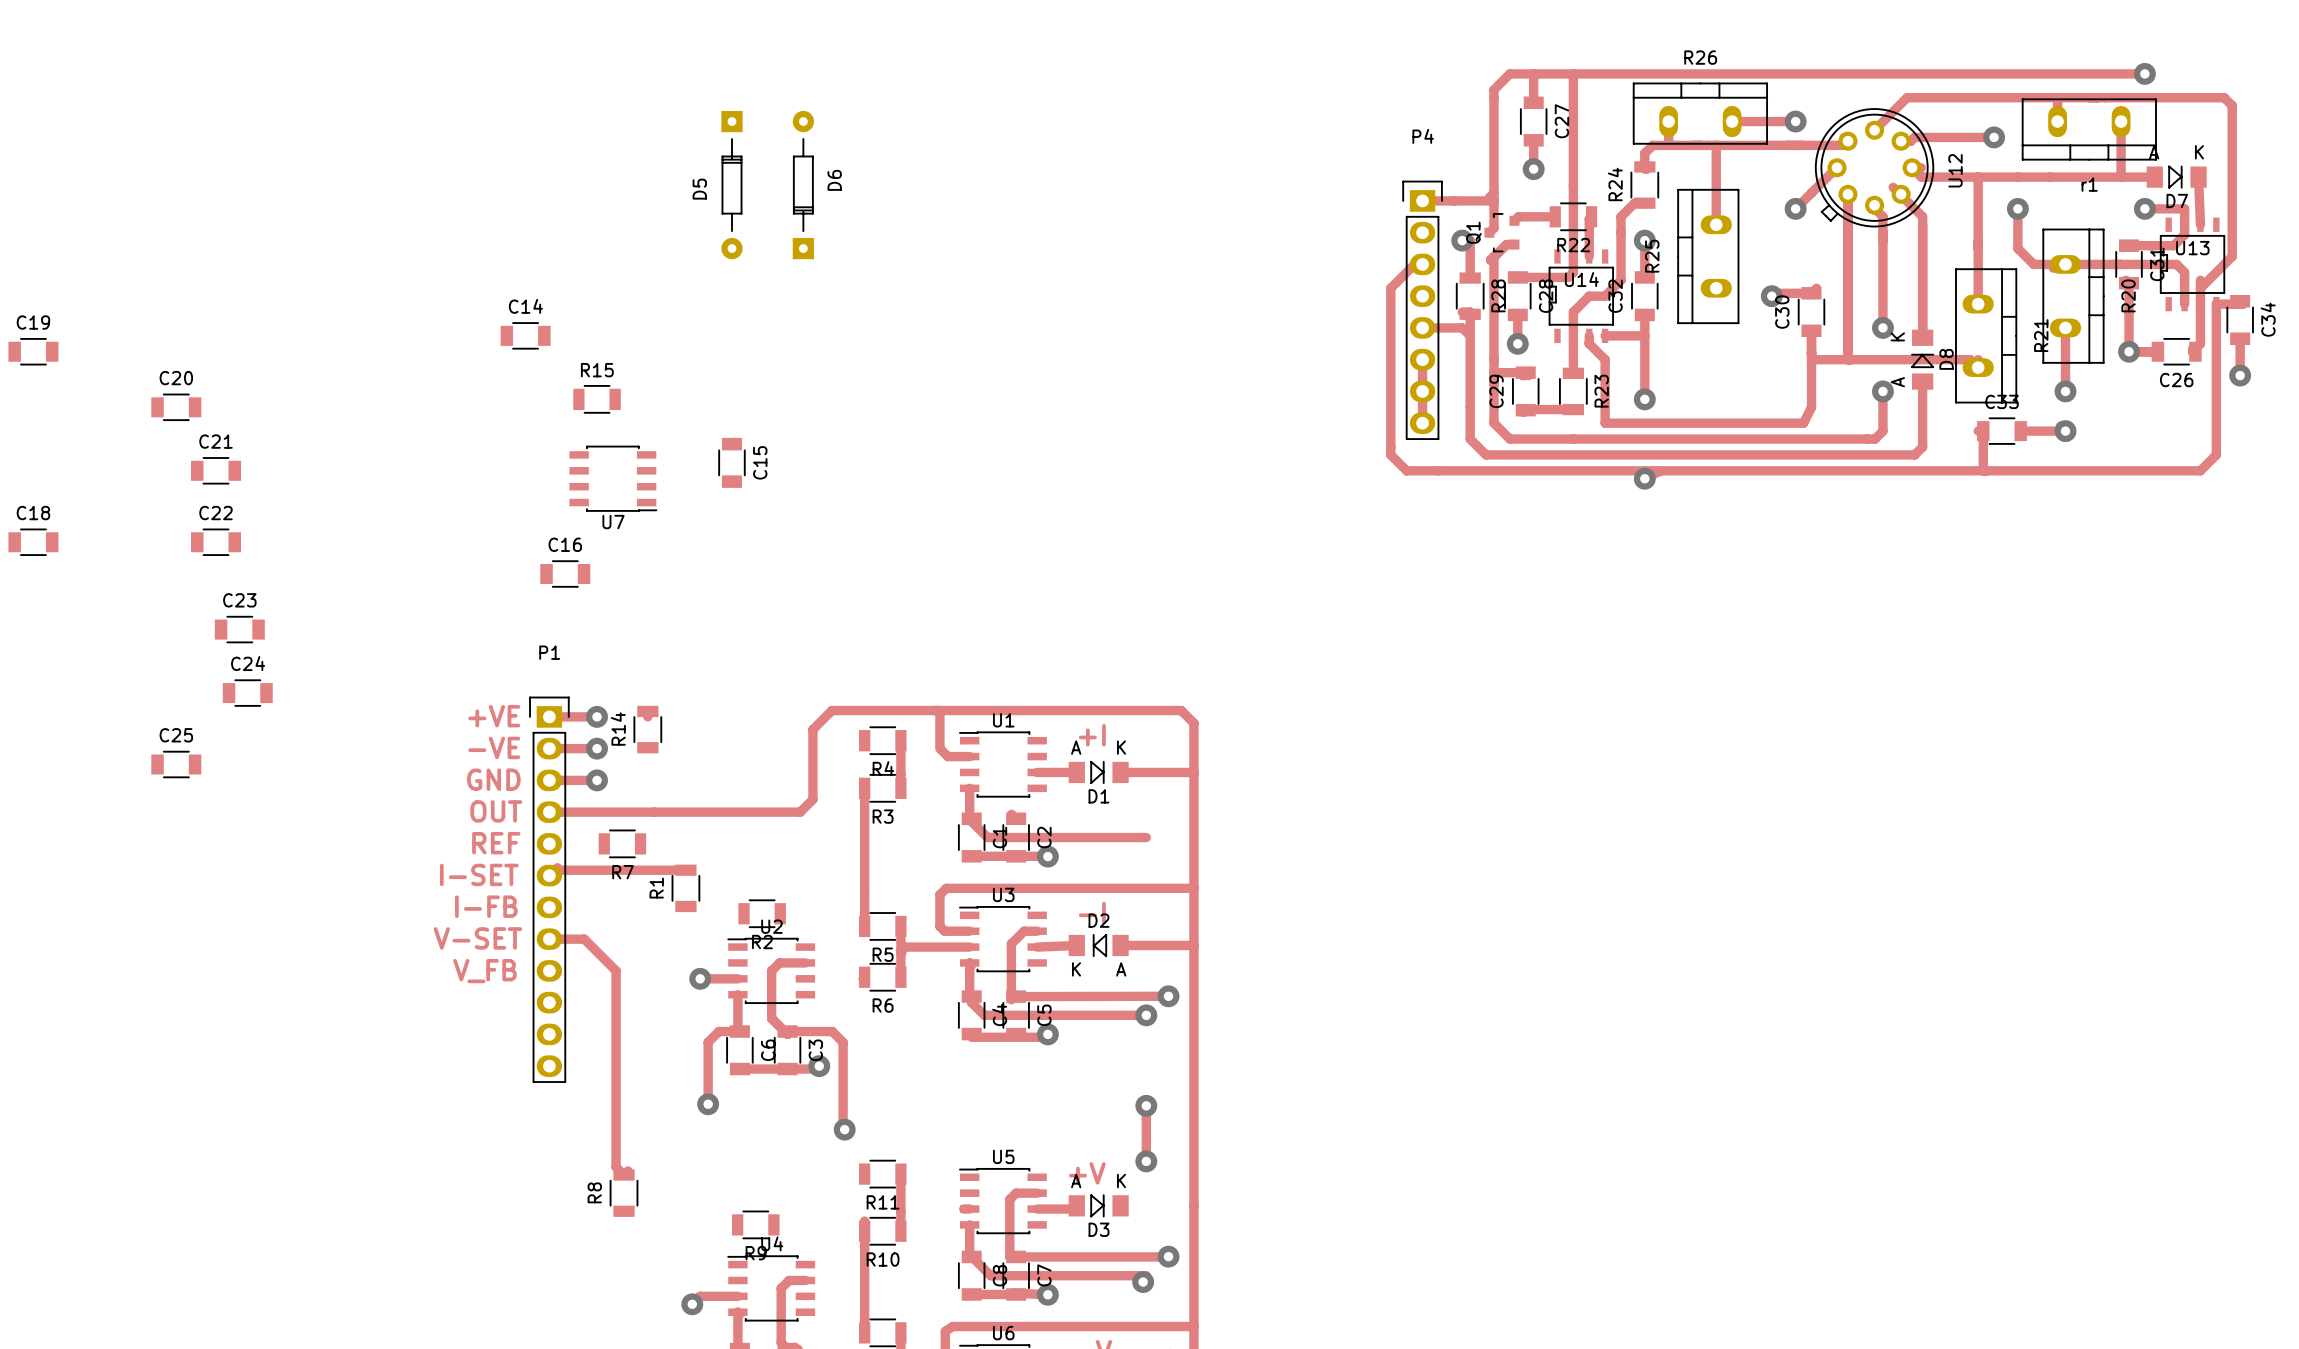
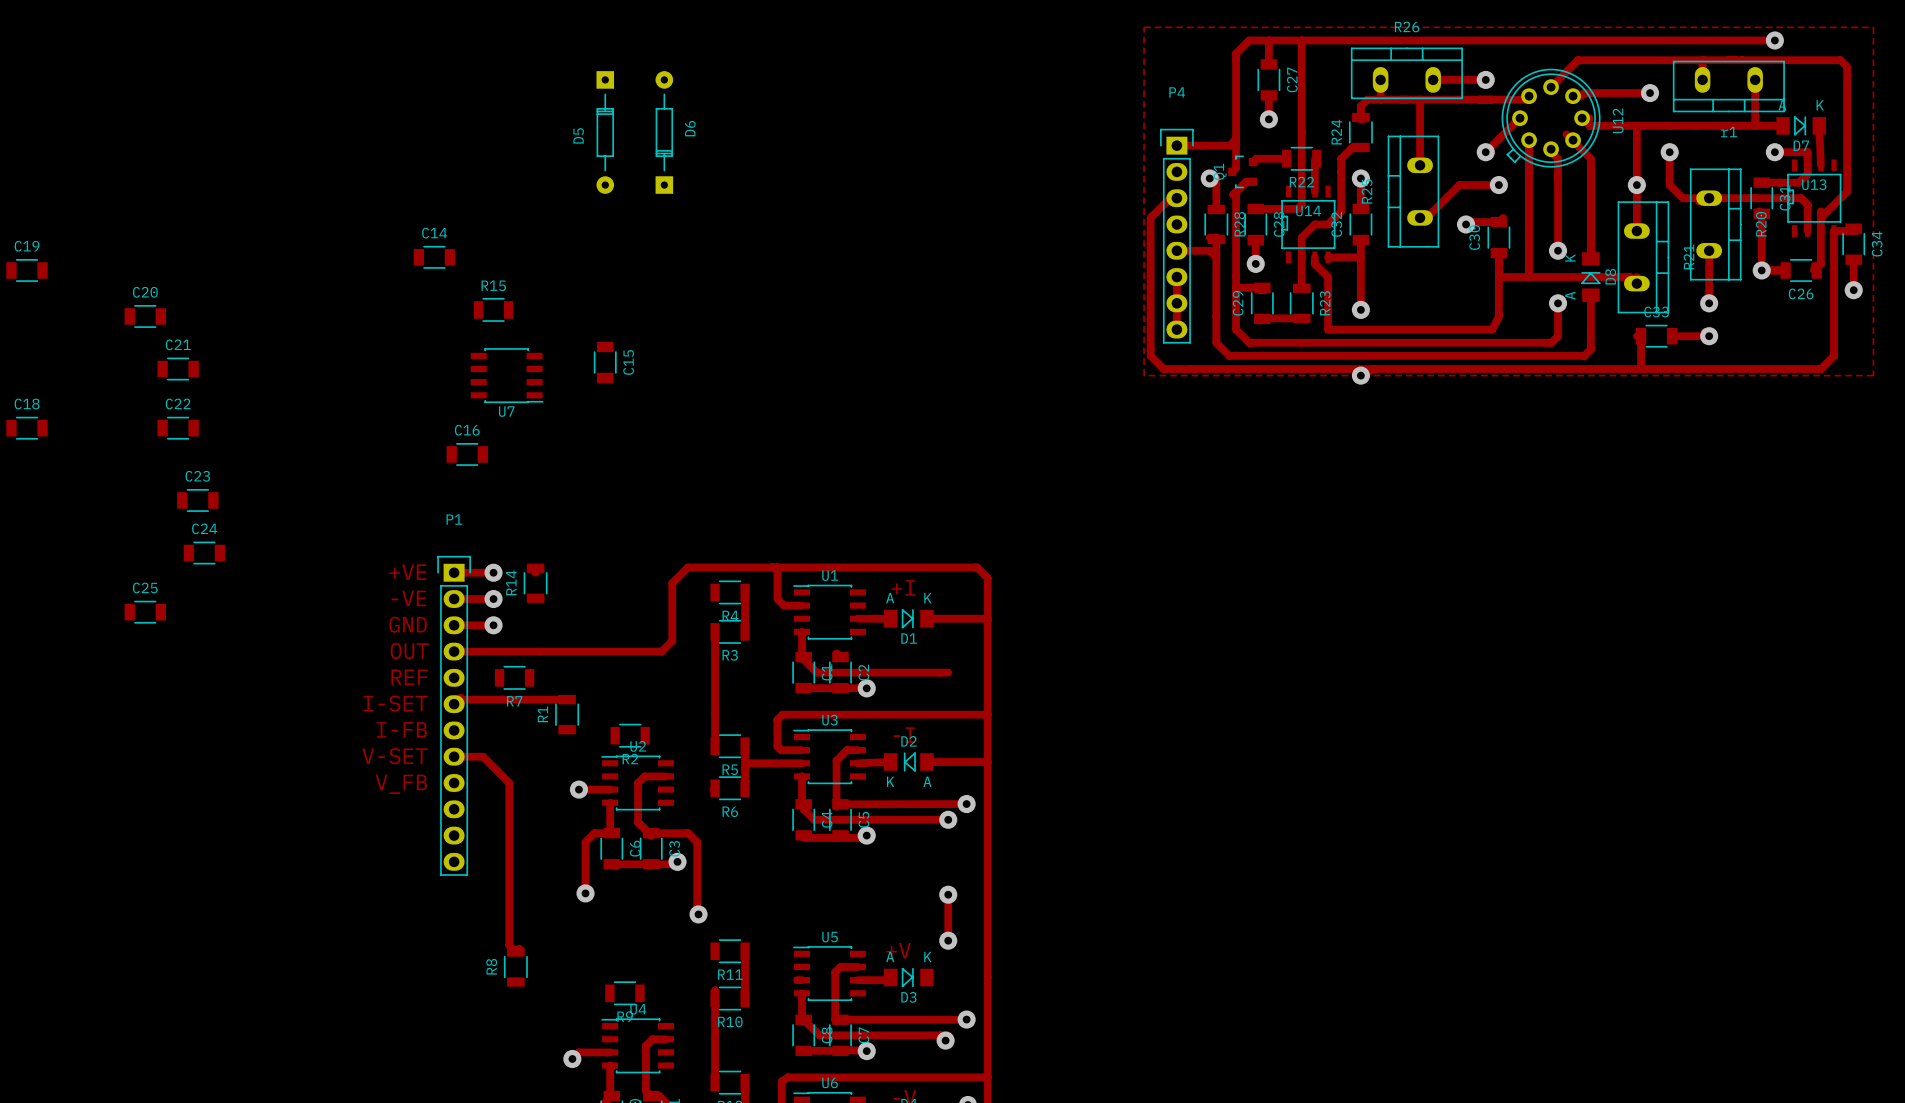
zone outline: none -> (1144, 27) (1144, 375) (1873, 375) (1873, 27) (1144, 27)
track: none -> (1498, 185) (1459, 185) (1426, 217) (1420, 217)
via: none -> (1498, 185)
via: none -> (1636, 185)

